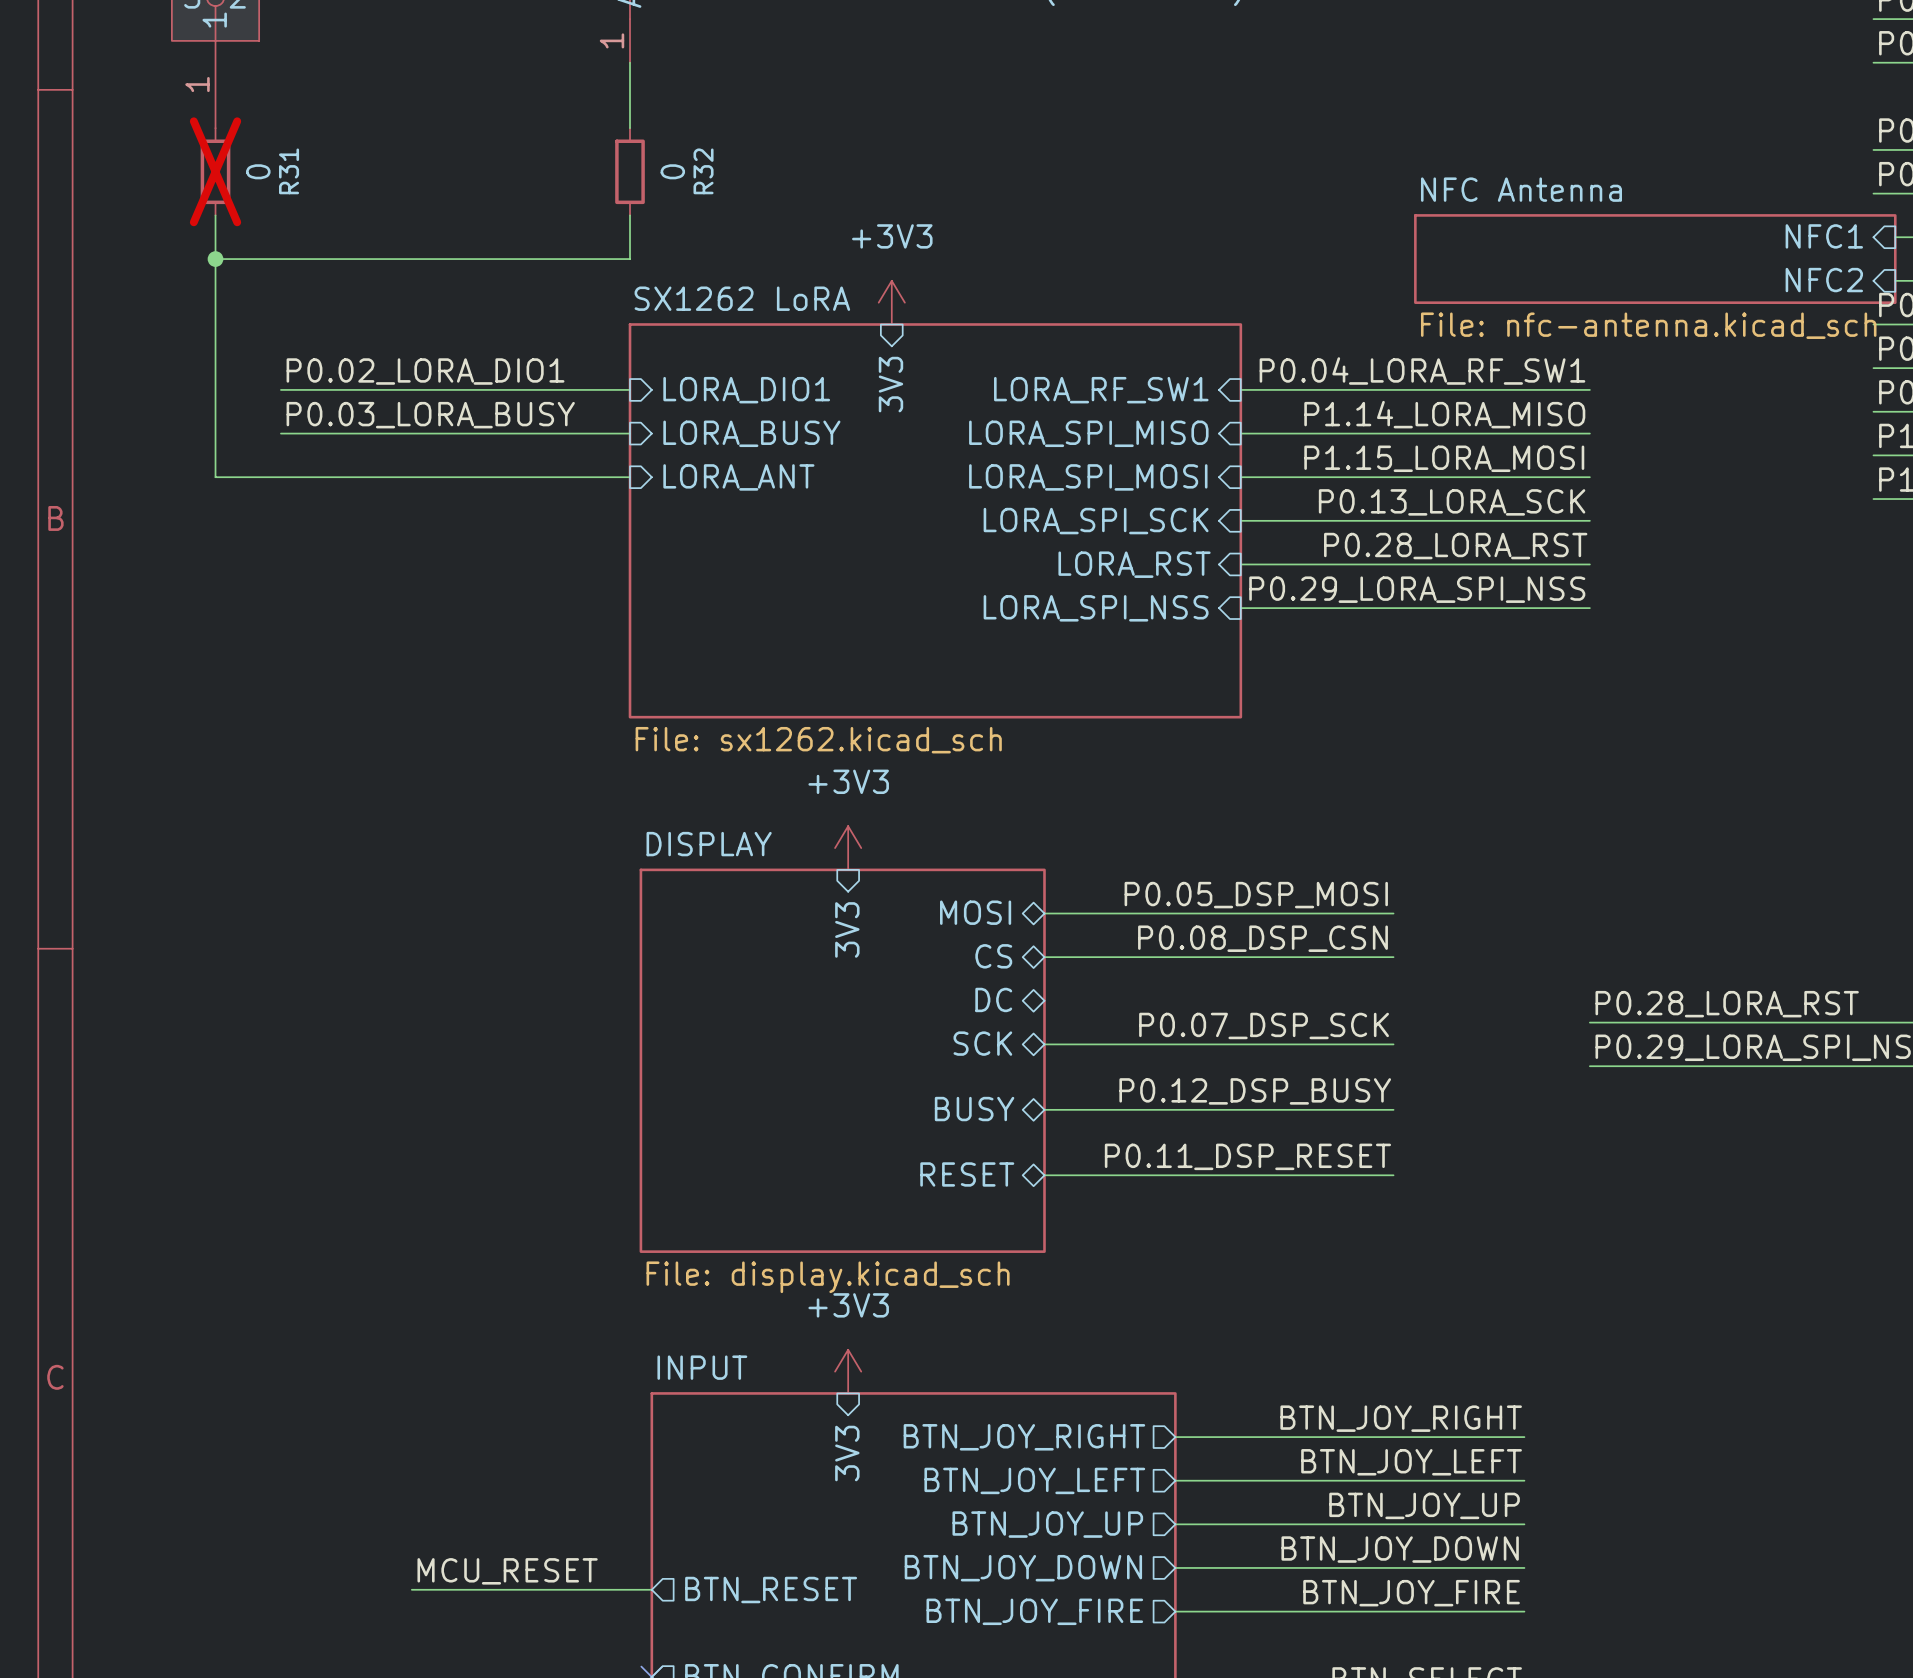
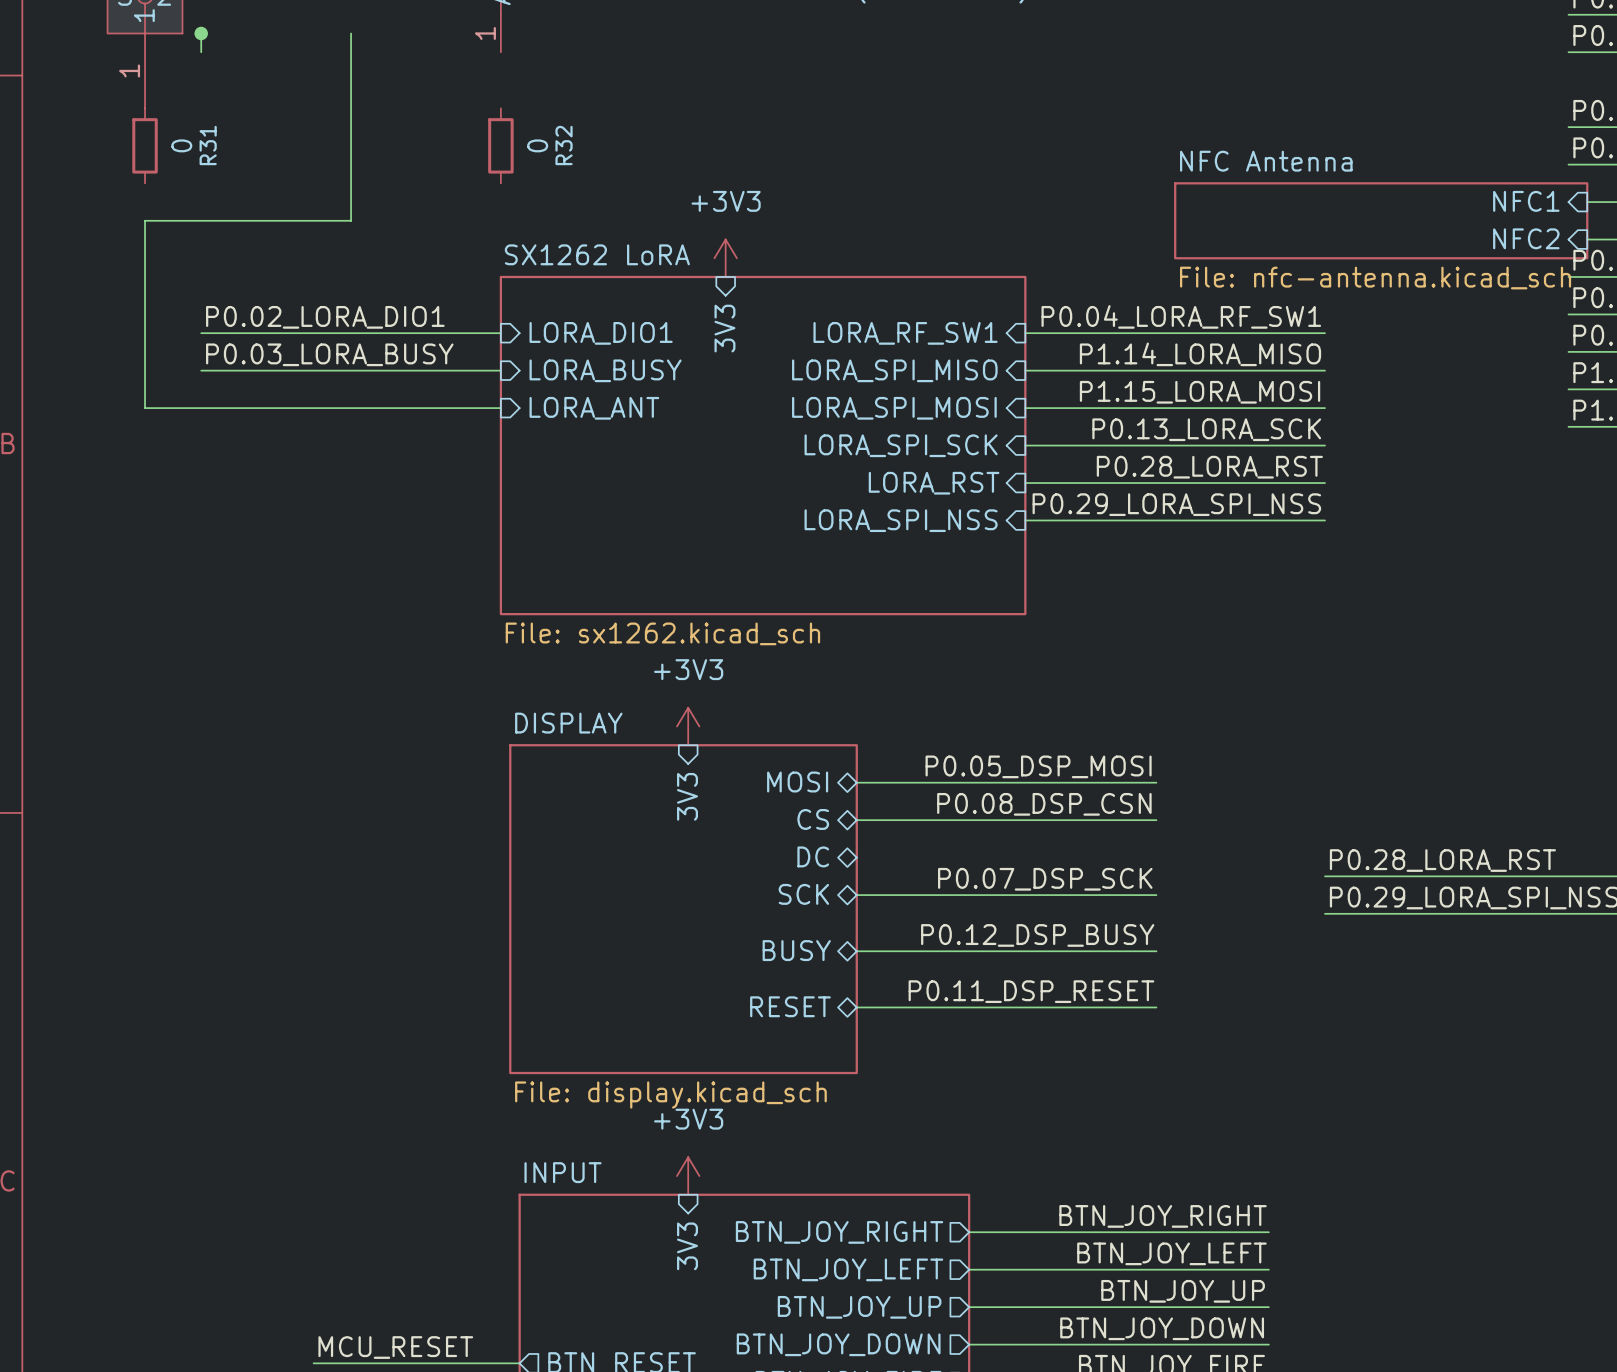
wire: none -> (201, 33) (201, 52)
junction: none -> (201, 33)
wire: (630, 62) (630, 128) -> none
R31 do-not-place cross: (215, 171) -> none
wire: (215, 215) (215, 259) -> none
wire: (630, 215) (630, 259) (455, 259) -> (351, 33) (351, 220)
junction: (215, 259) -> none

